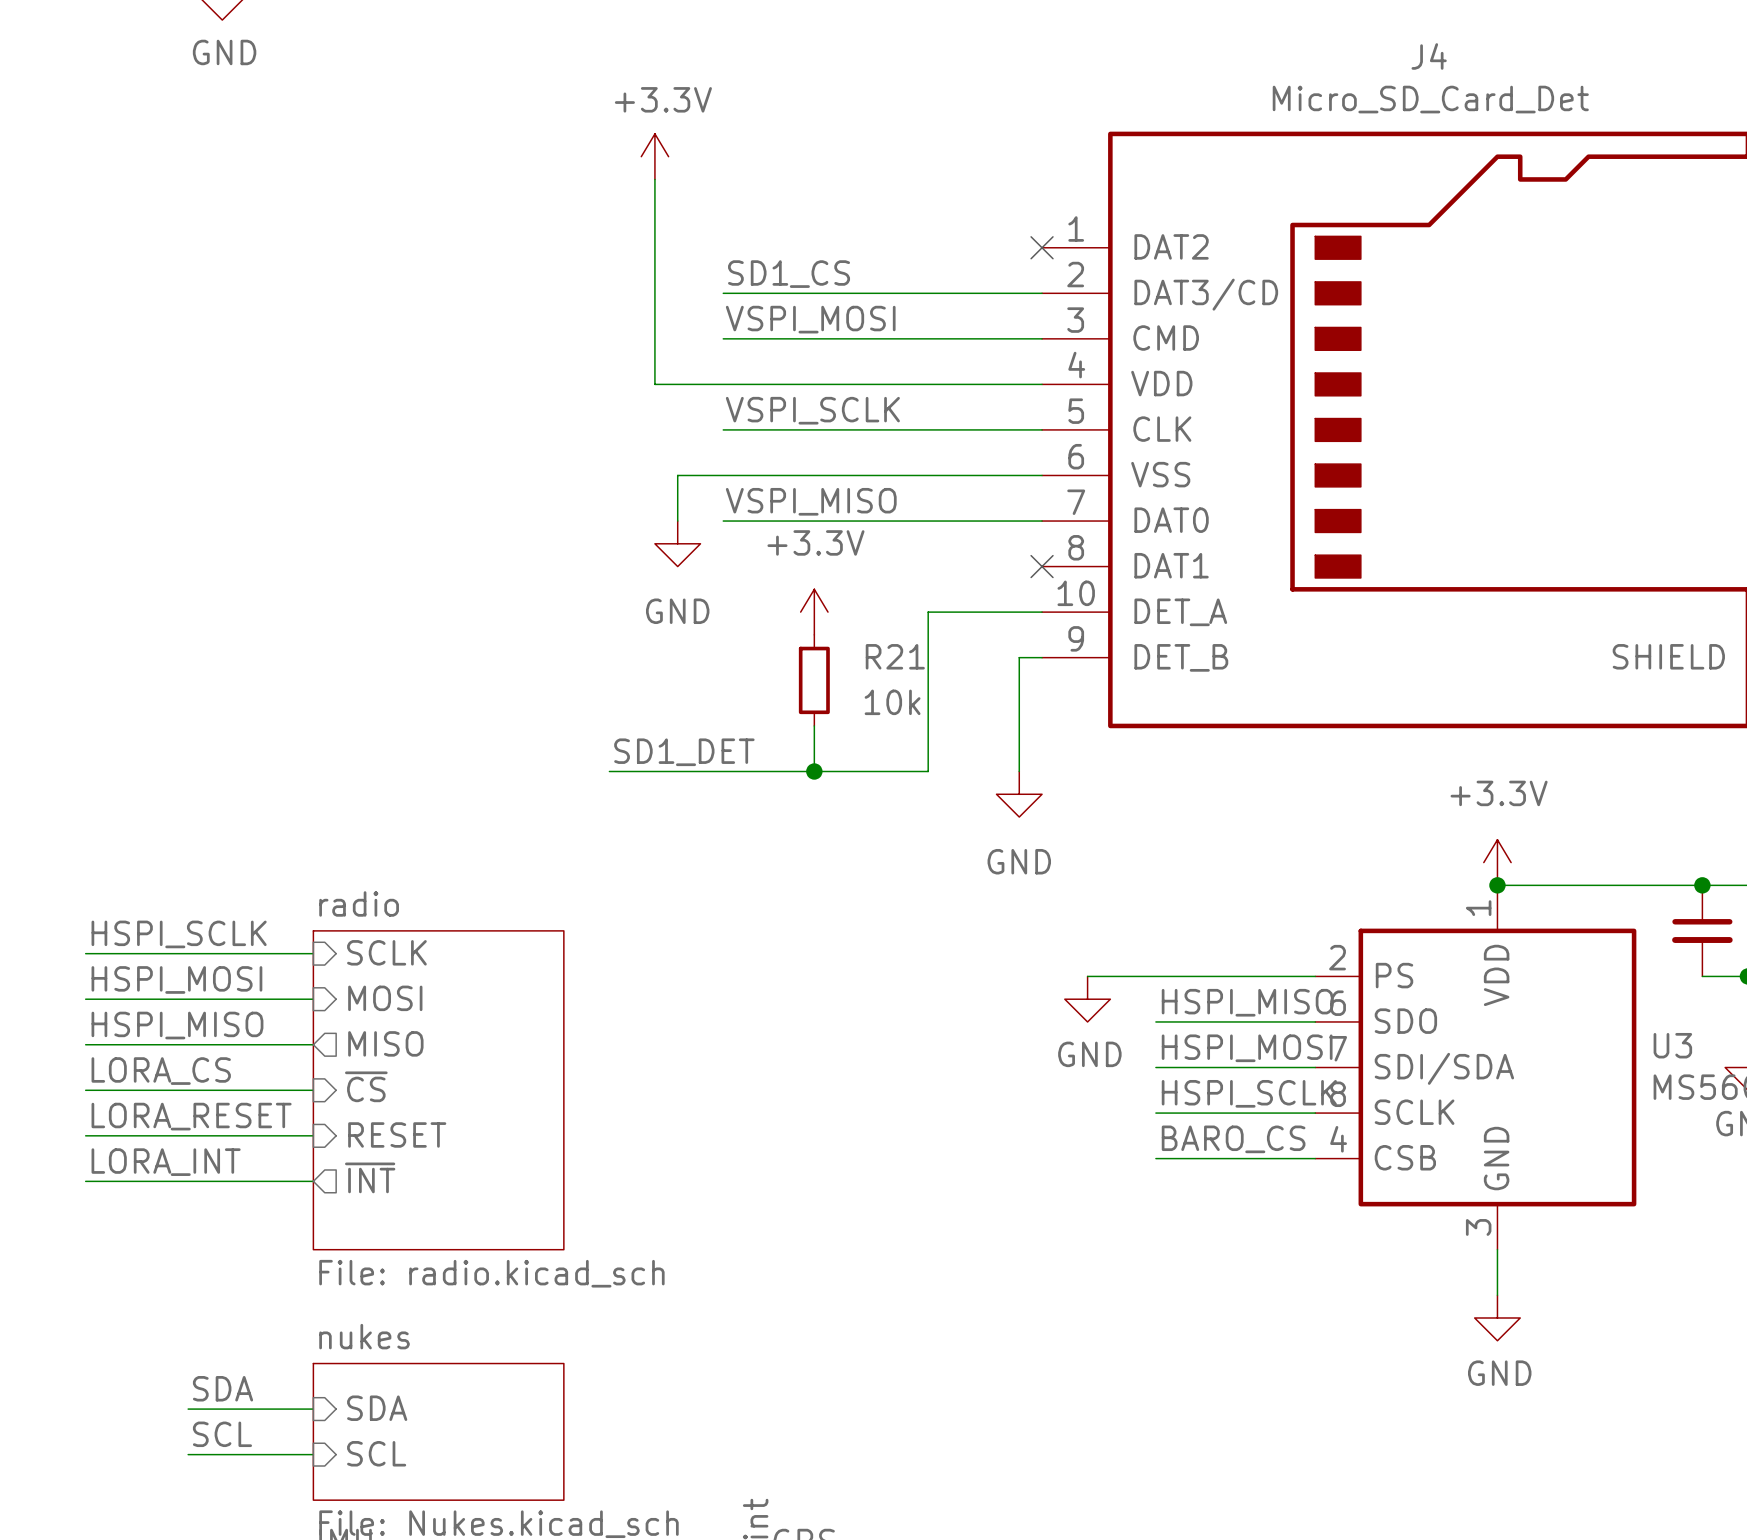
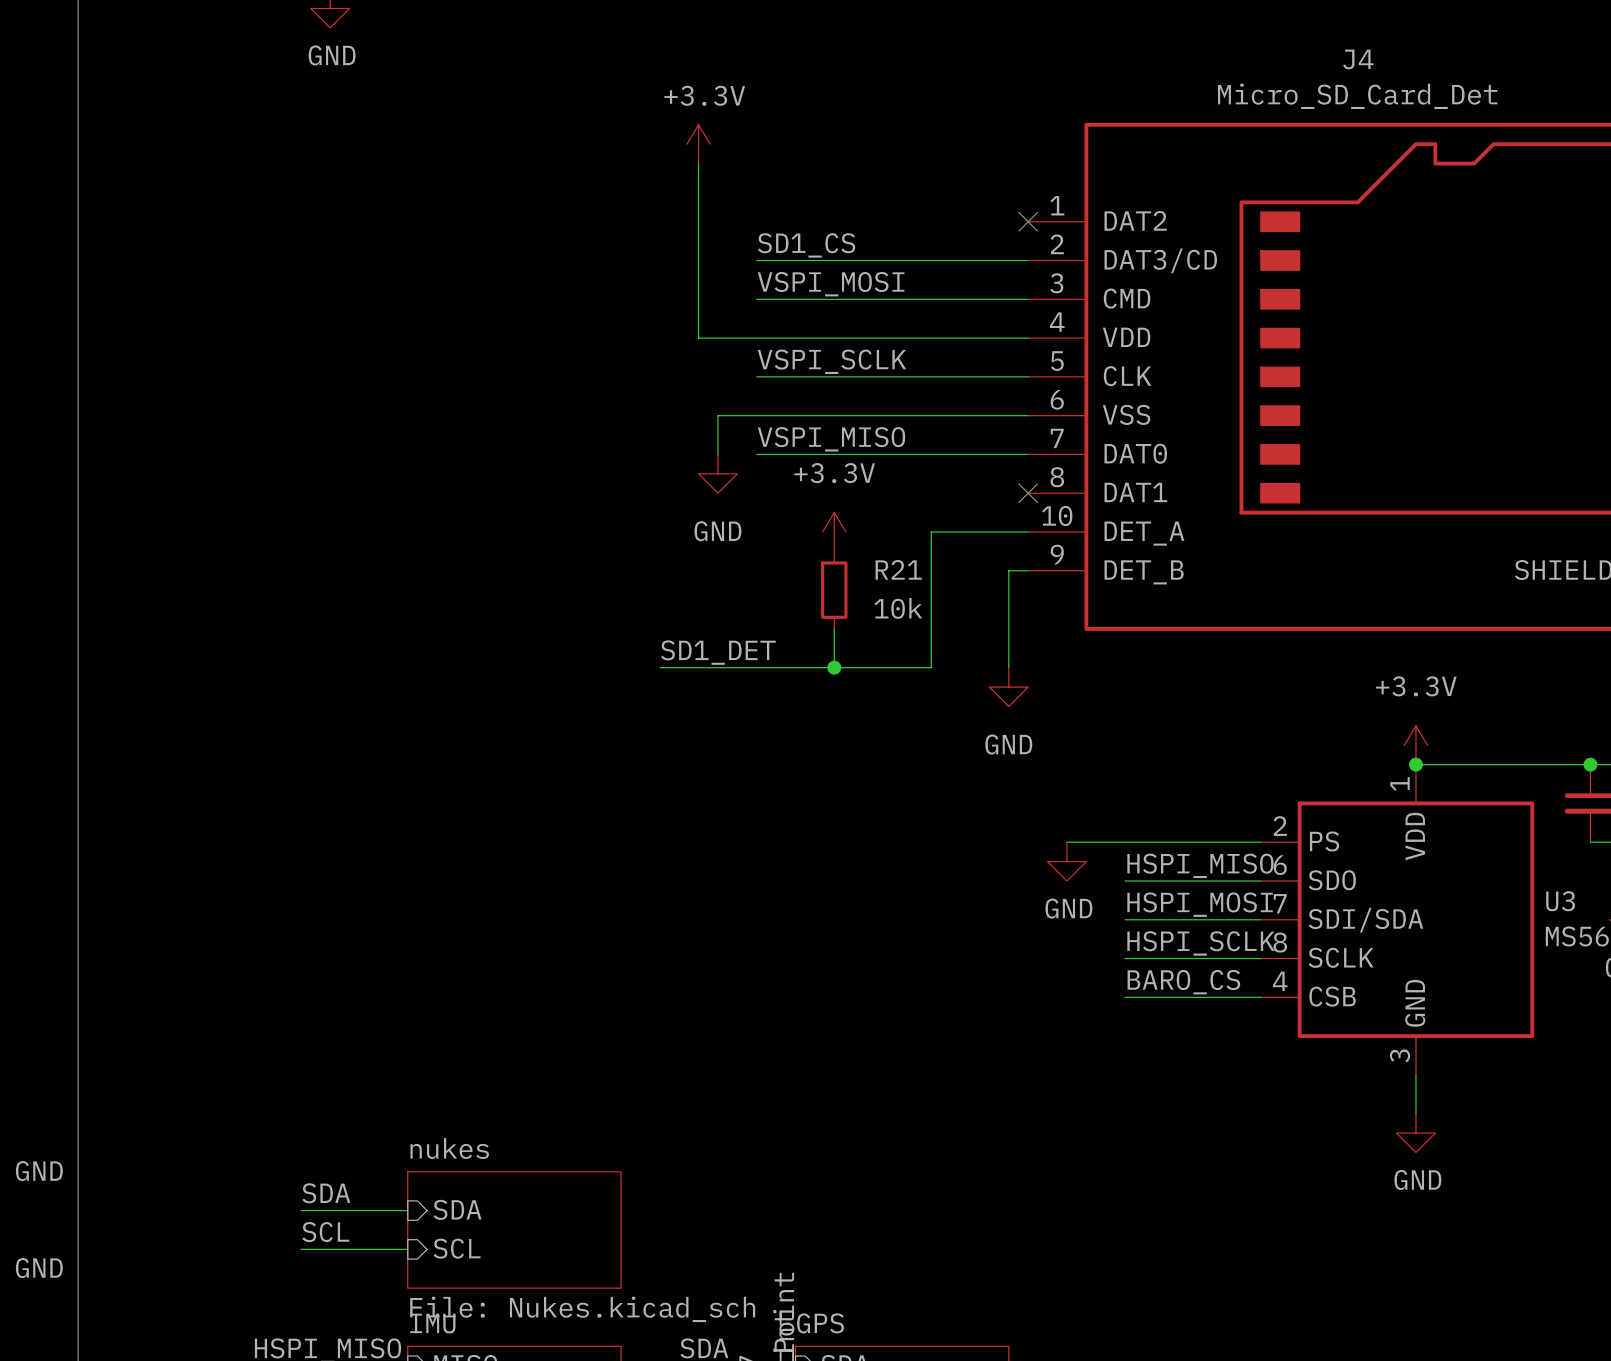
label: HSPI_SCLK (179, 934) -> none
sheet pin: SCLK (386, 952) -> none
wire: (85, 953) (313, 953) -> none
label: HSPI_MOSI (176, 979) -> none
sheet pin: MOSI (385, 998) -> none
wire: (85, 999) (313, 999) -> none
label: HSPI_MISO (177, 1025) -> none
sheet pin: MISO (385, 1043) -> none
wire: (85, 1044) (313, 1044) -> none
label: LORA_CS (161, 1071) -> none
sheet pin: ~{CS} (366, 1086) -> none
wire: (85, 1090) (313, 1090) -> none
sheet radio: File: radio.kicad_sch (438, 1090) -> none
label: LORA_RESET (191, 1116) -> none
sheet pin: RESET (397, 1134) -> none
wire: (85, 1135) (313, 1135) -> none
label: LORA_INT (166, 1162) -> none
sheet pin: ~{INT} (370, 1177) -> none
wire: (85, 1181) (313, 1181) -> none

